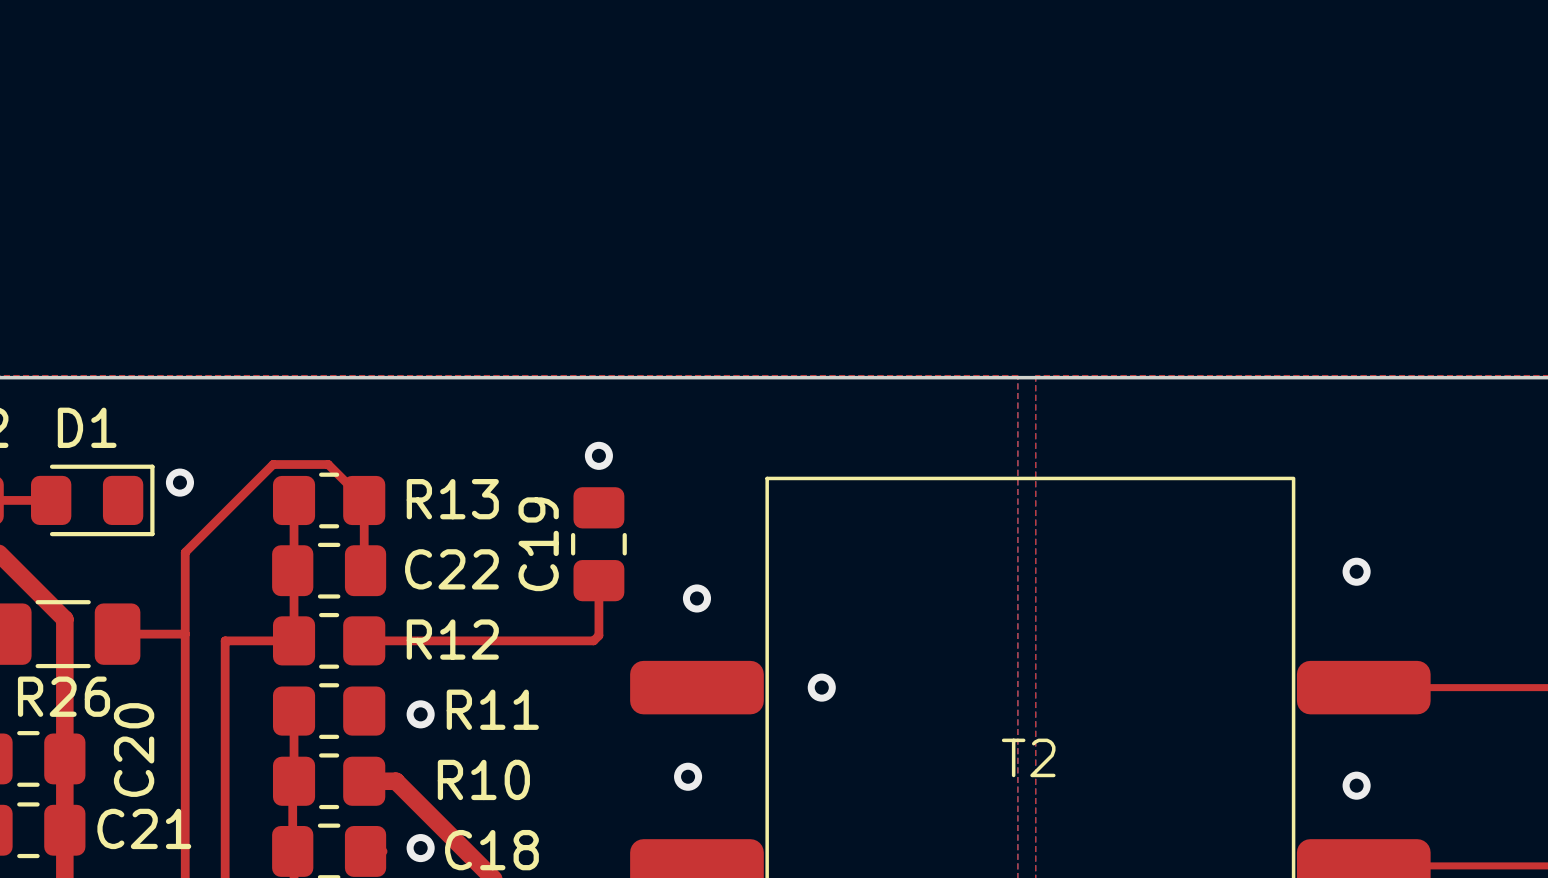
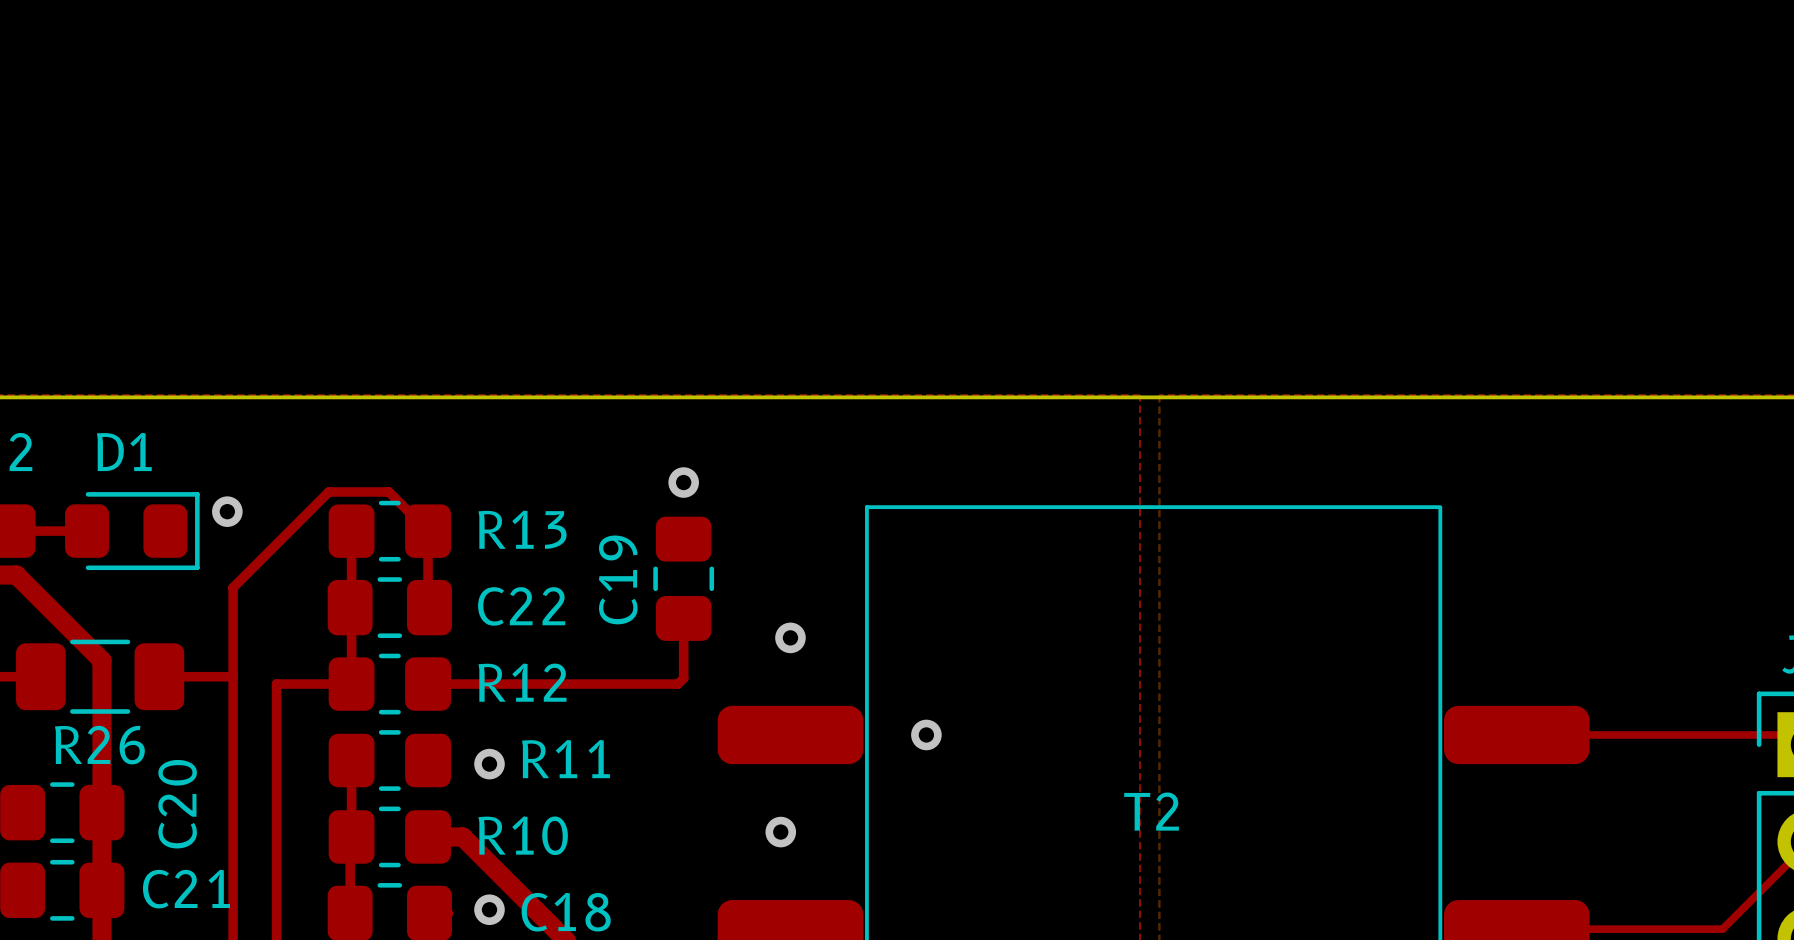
via: (1356, 571) -> none
R10 name position: R10 (483, 779) -> R10 (523, 835)
via: (1356, 785) -> none

